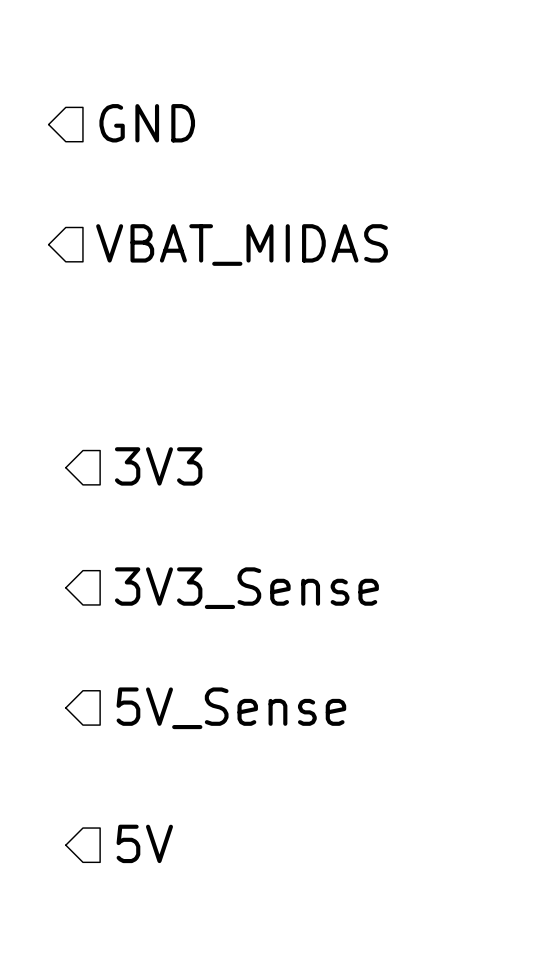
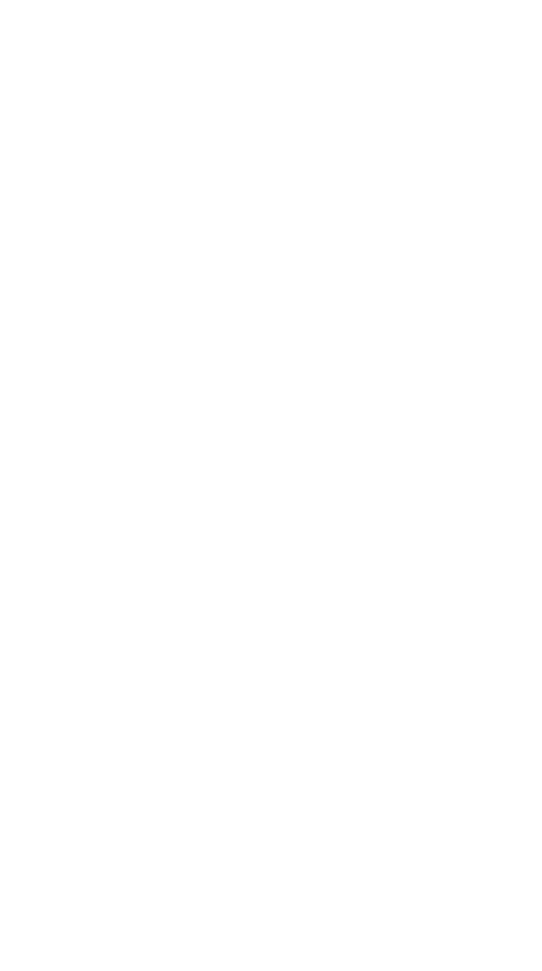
hierarchical label: GND (147, 123) -> none
hierarchical label: VBAT_MIDAS (242, 245) -> none
hierarchical label: 3V3 (158, 466) -> none
hierarchical label: 3V3_Sense (246, 588) -> none
hierarchical label: 5V_Sense (231, 708) -> none
hierarchical label: 5V (144, 843) -> none

